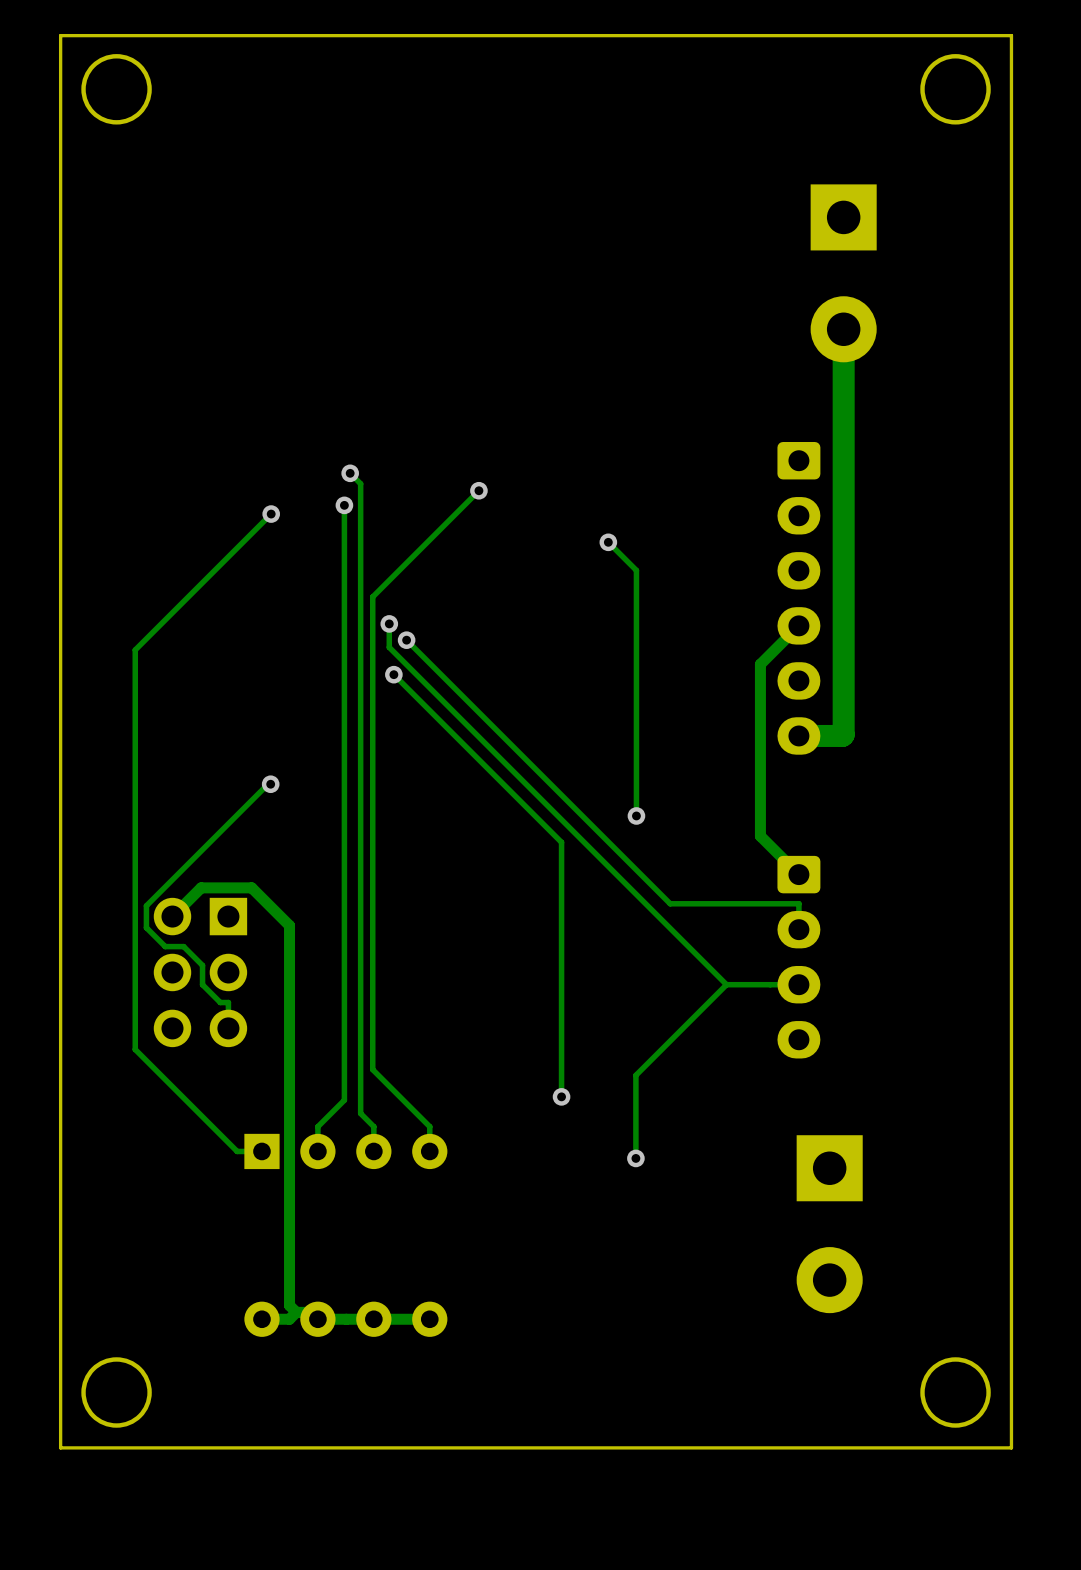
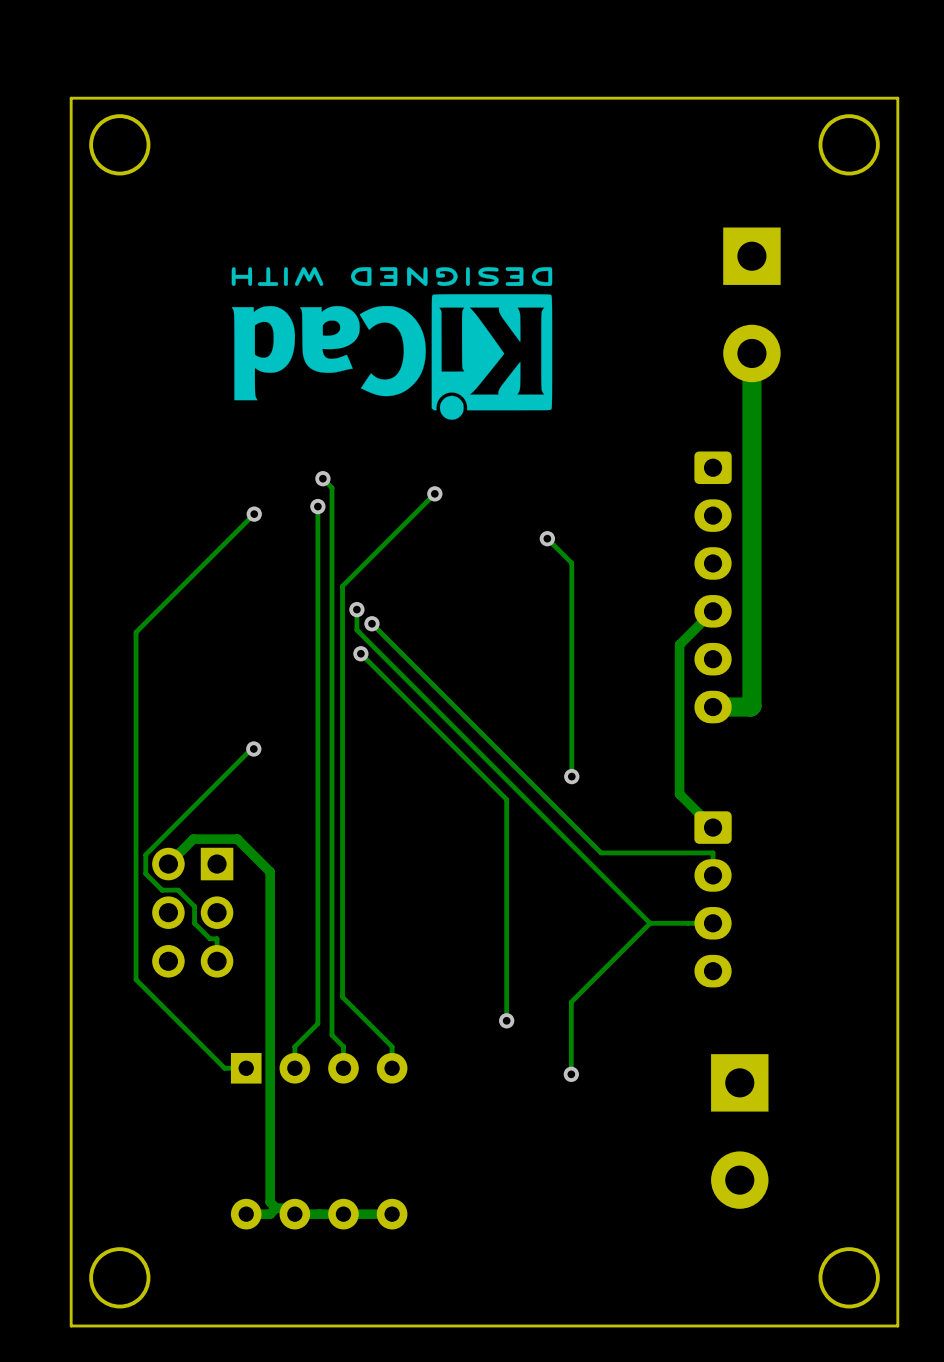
drawing: none -> [231, 267, 553, 420]

